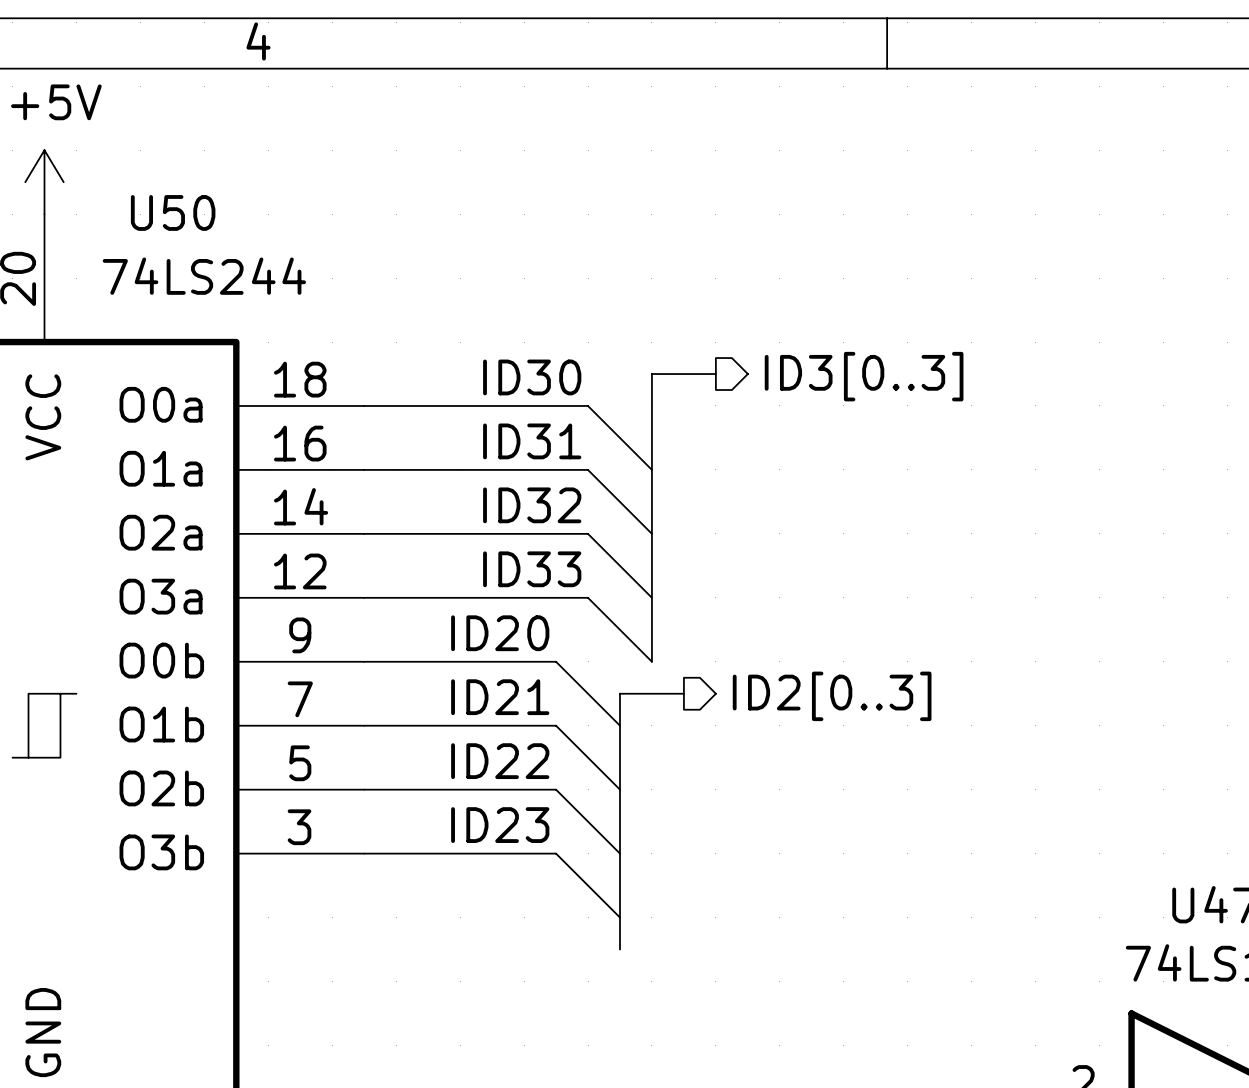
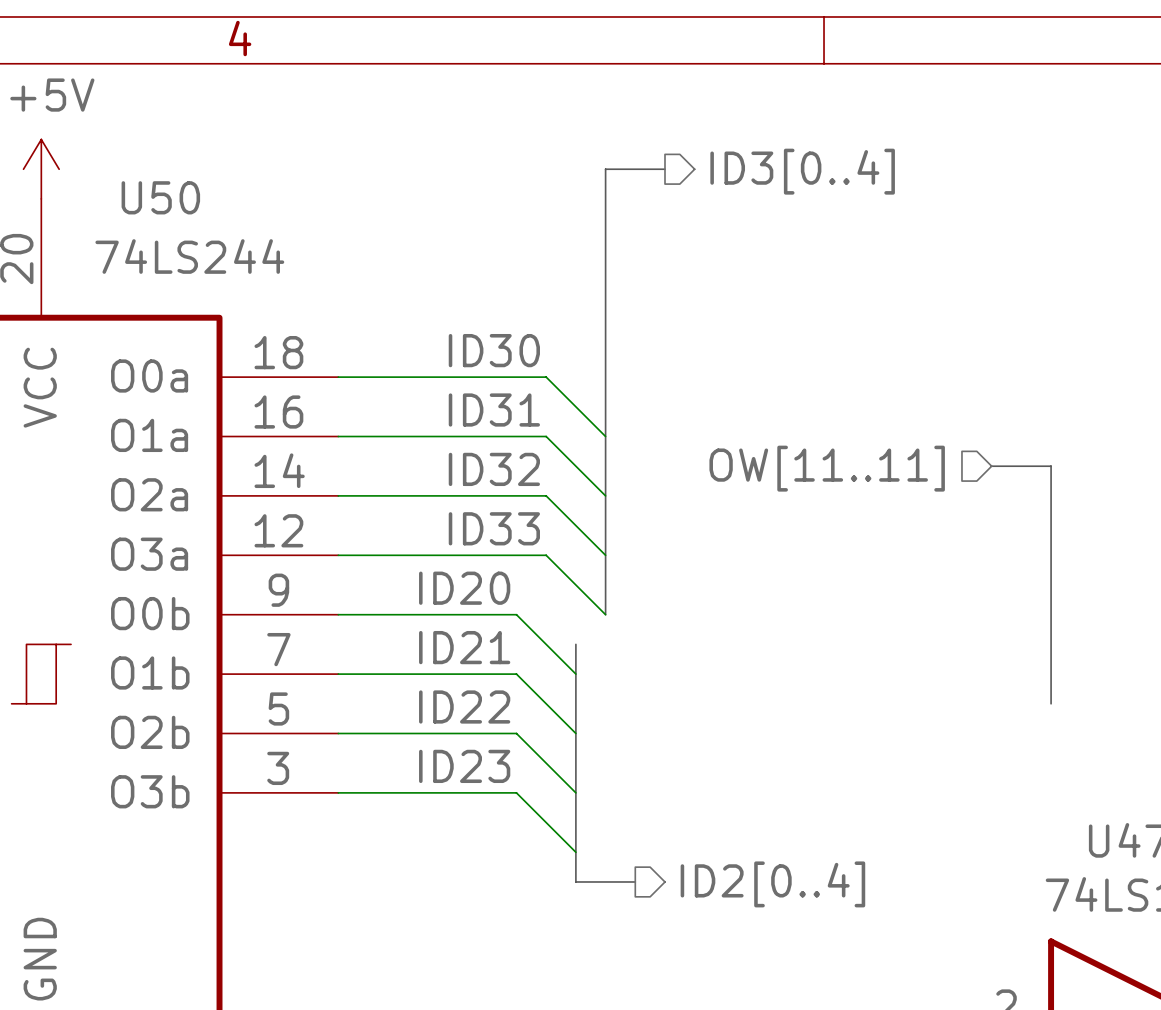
hierarchical label: none -> ID3[0..4] (802, 171)
bus: (651, 374) (715, 374) -> (605, 347) (605, 169) (664, 169)
hierarchical label: ID3[0..3] (864, 376) -> none
bus: none -> (991, 466) (1051, 466) (1051, 703)
hierarchical label: none -> OW[11..11] (827, 468)
bus: (620, 693) (683, 693) -> (575, 881) (635, 881)
hierarchical label: ID2[0..3] (832, 696) -> none
hierarchical label: none -> ID2[0..4] (772, 884)

